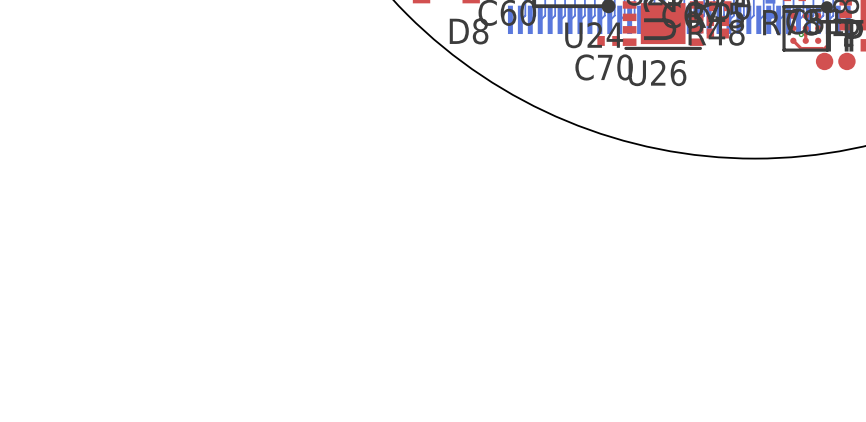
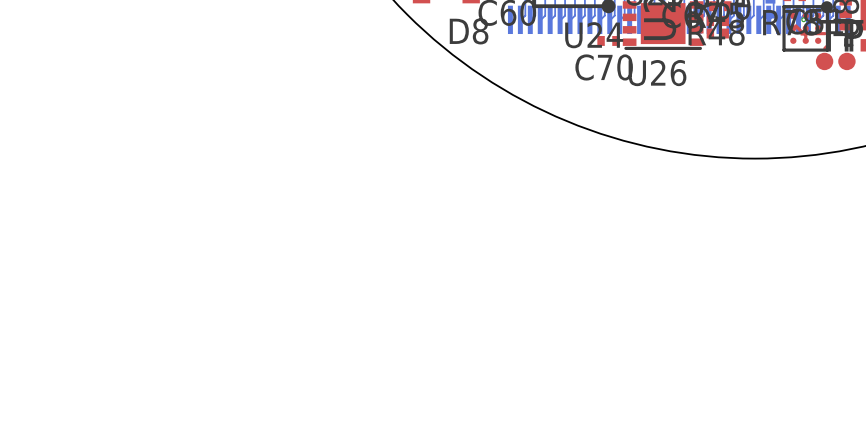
via position: (801, 34) -> (803, 19)
top track: (793, 40) (801, 48) (822, 48) -> (795, 25) (803, 33) (825, 33)

